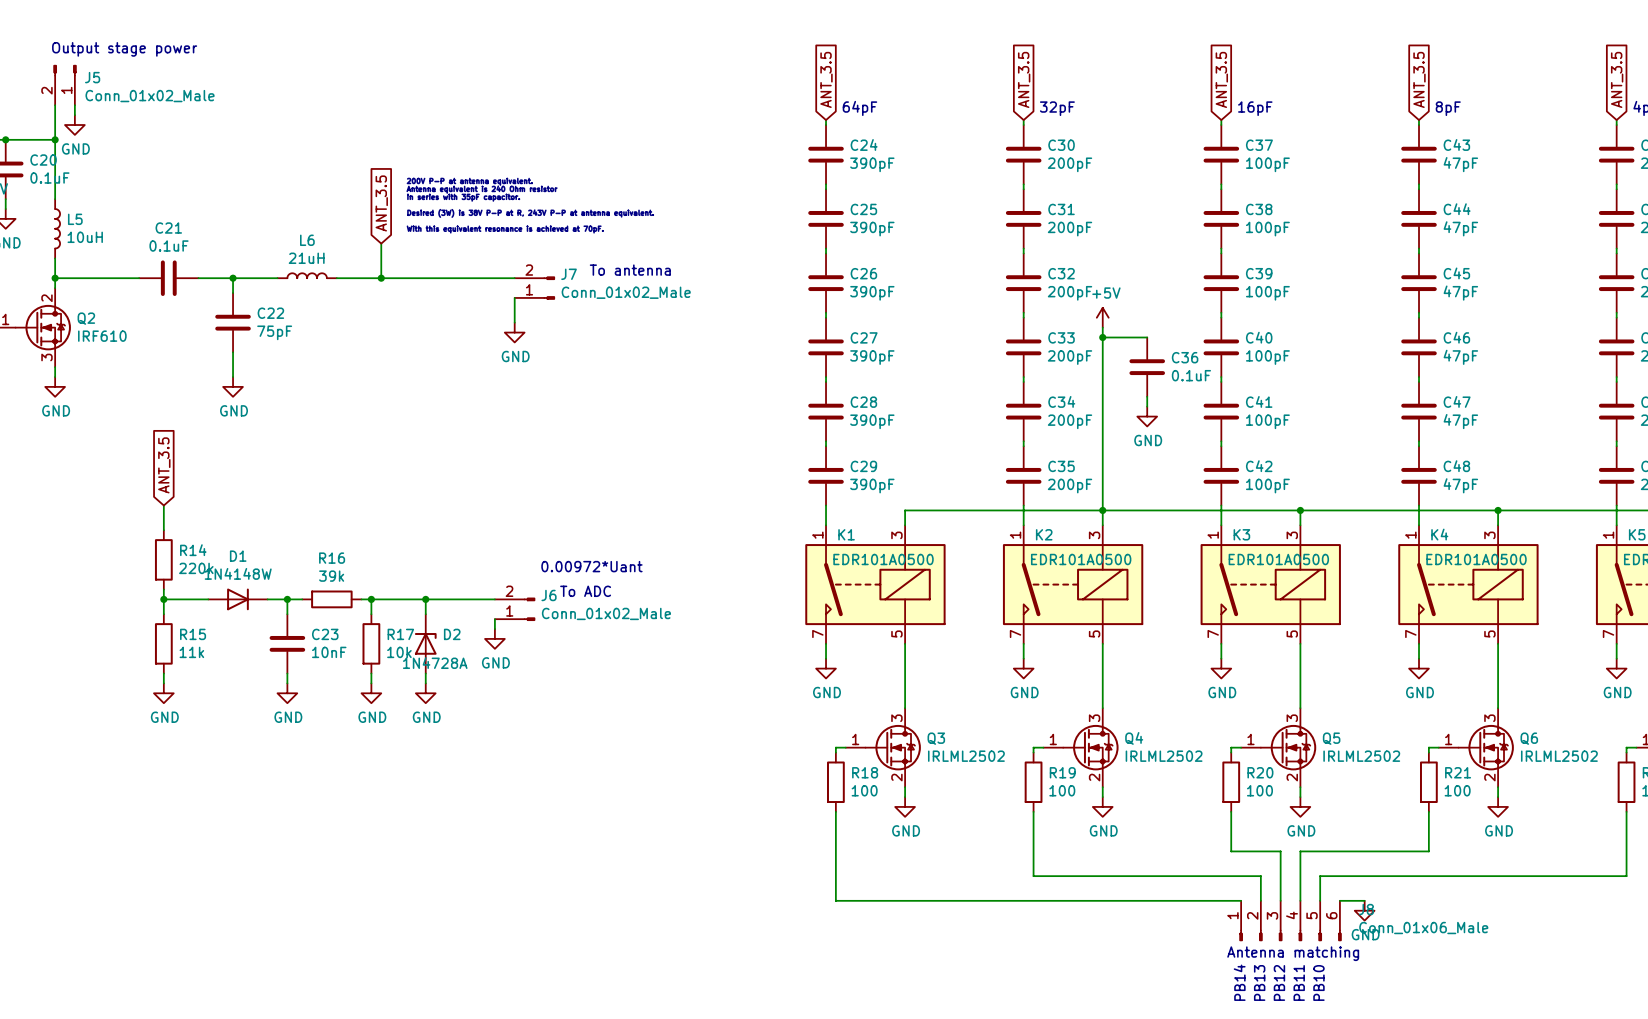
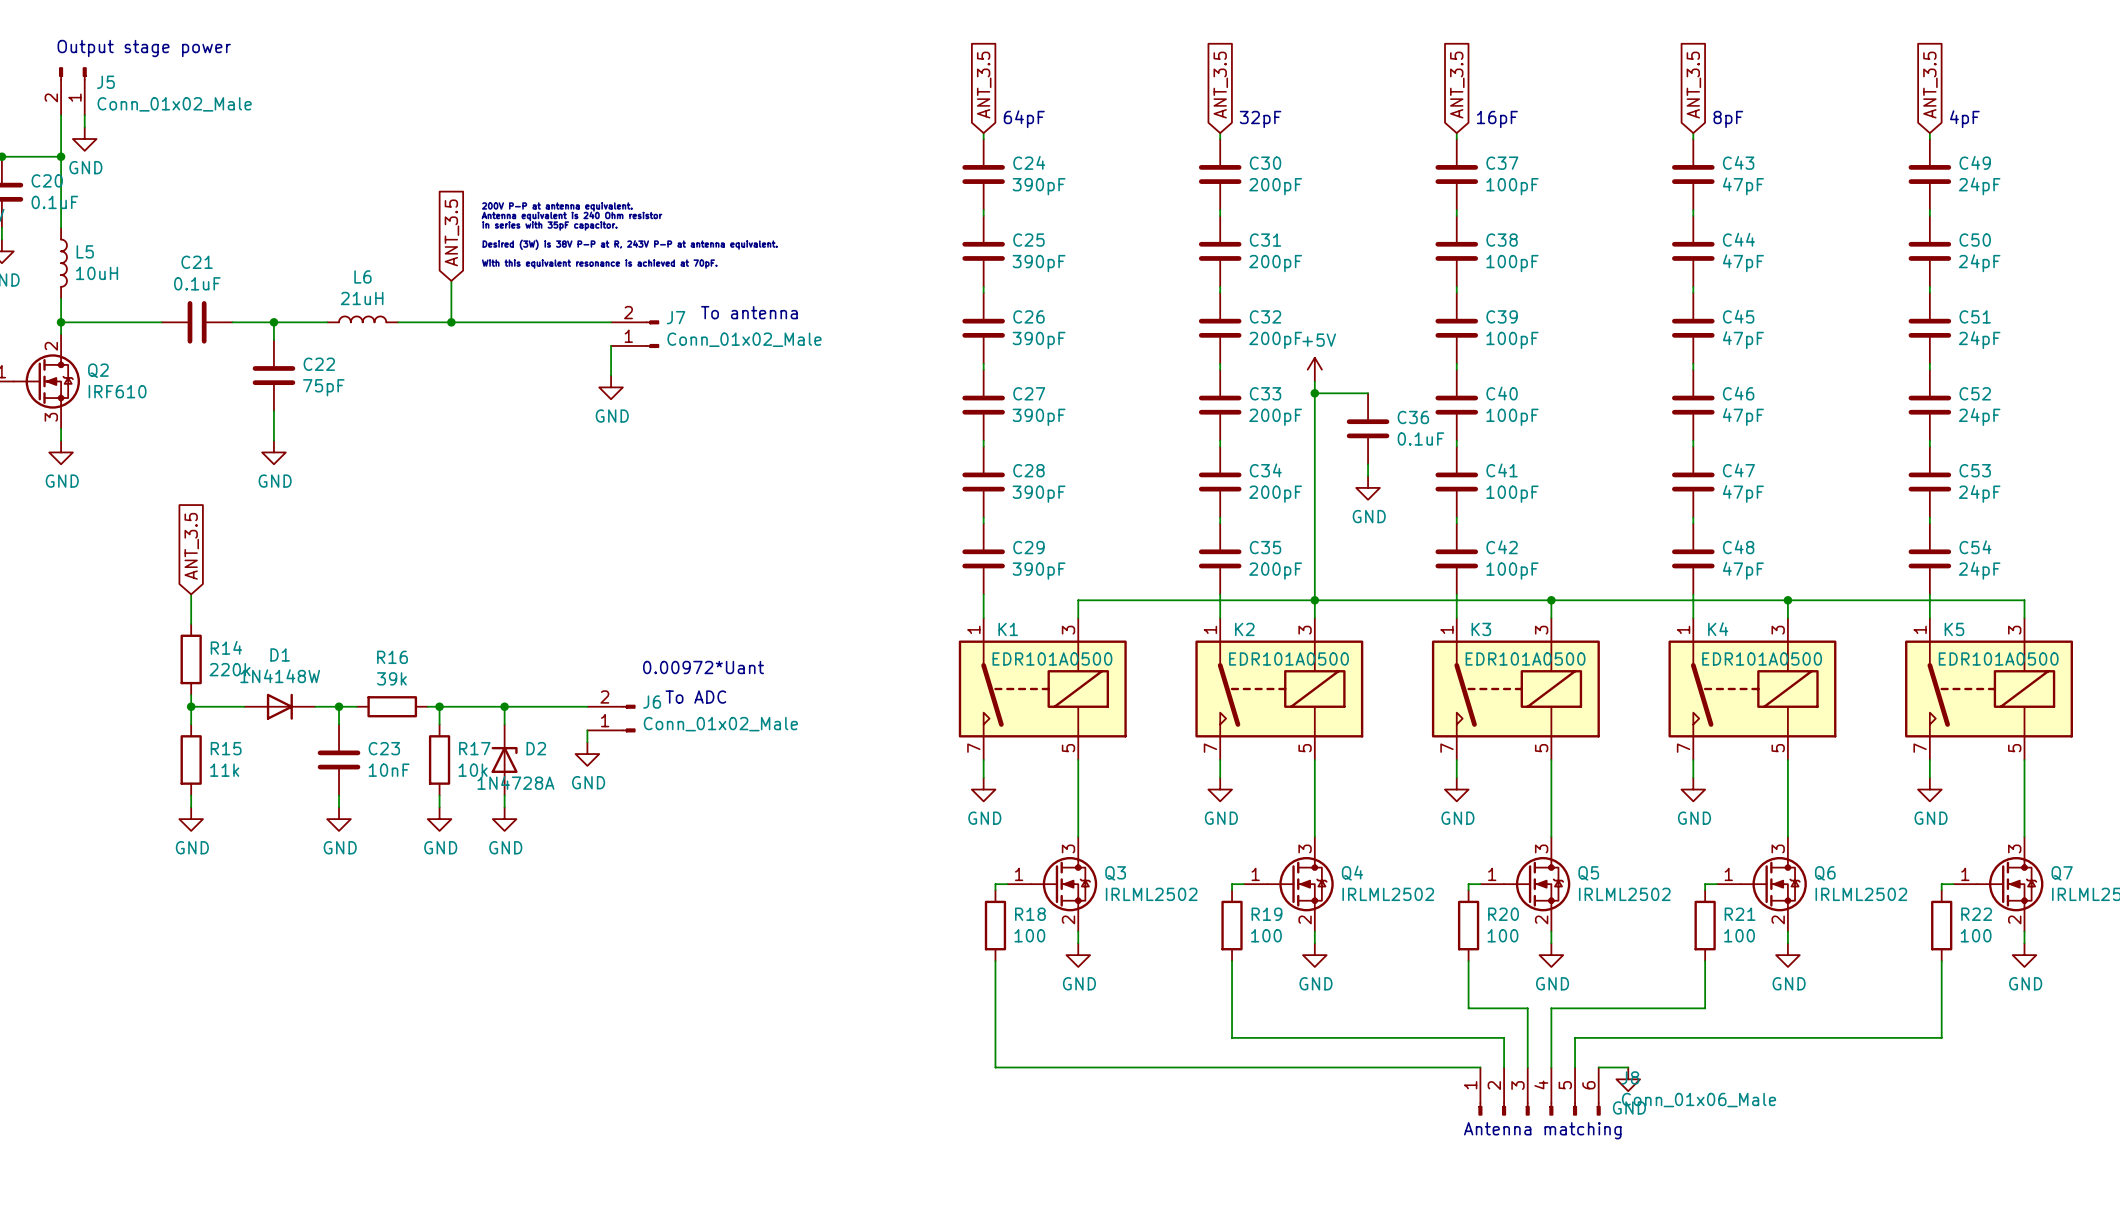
text: PB14 (1239, 982) -> none
text: PB13 (1259, 982) -> none
text: PB12 (1279, 982) -> none
text: PB11 (1299, 982) -> none
text: PB10 (1318, 982) -> none

